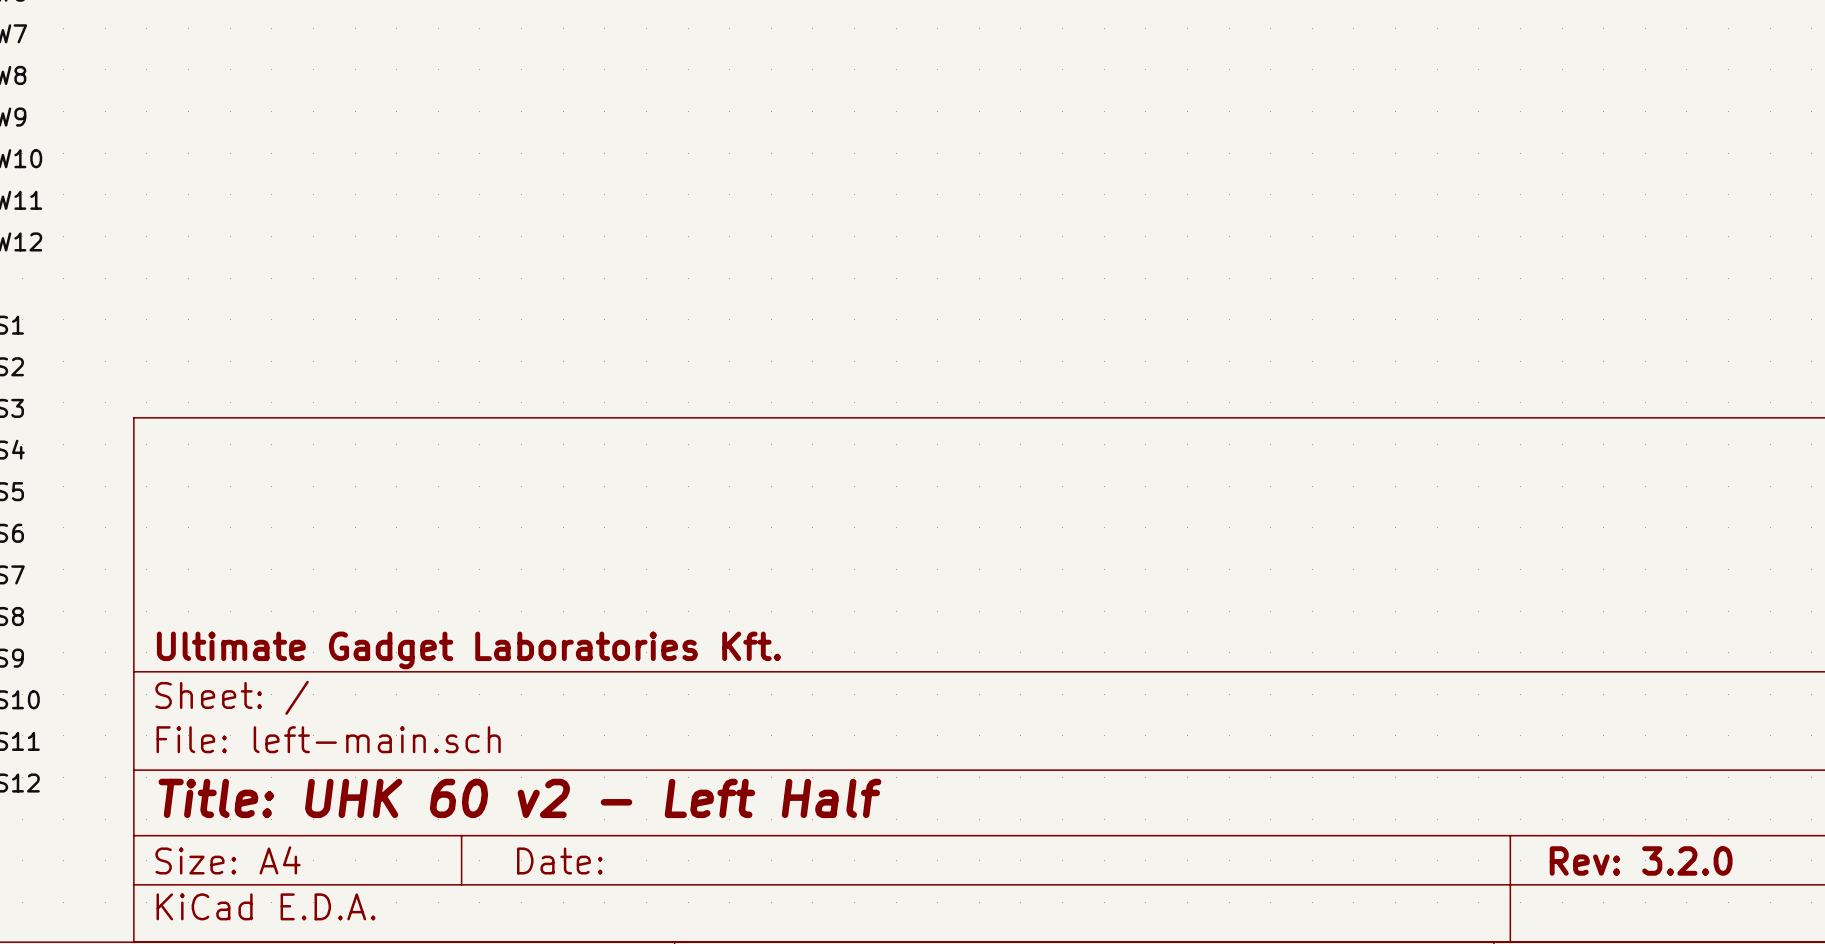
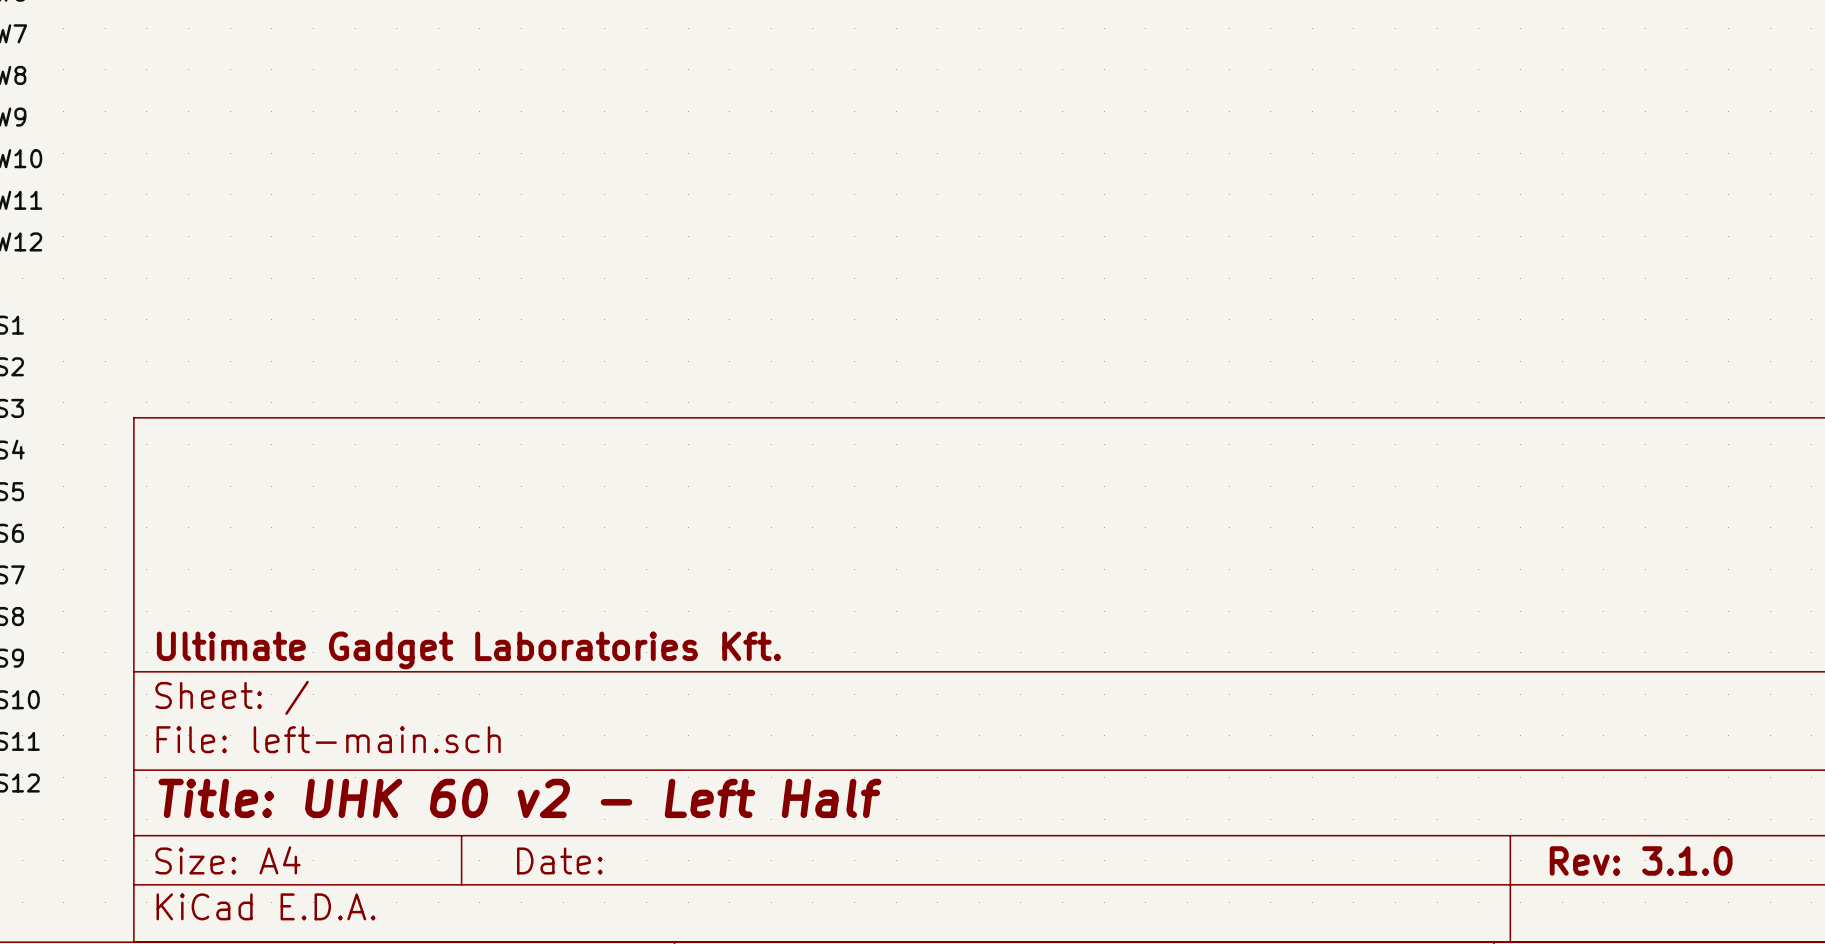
title block: Rev: 3.2.0 (1641, 860) -> Rev: 3.1.0 (1641, 860)

